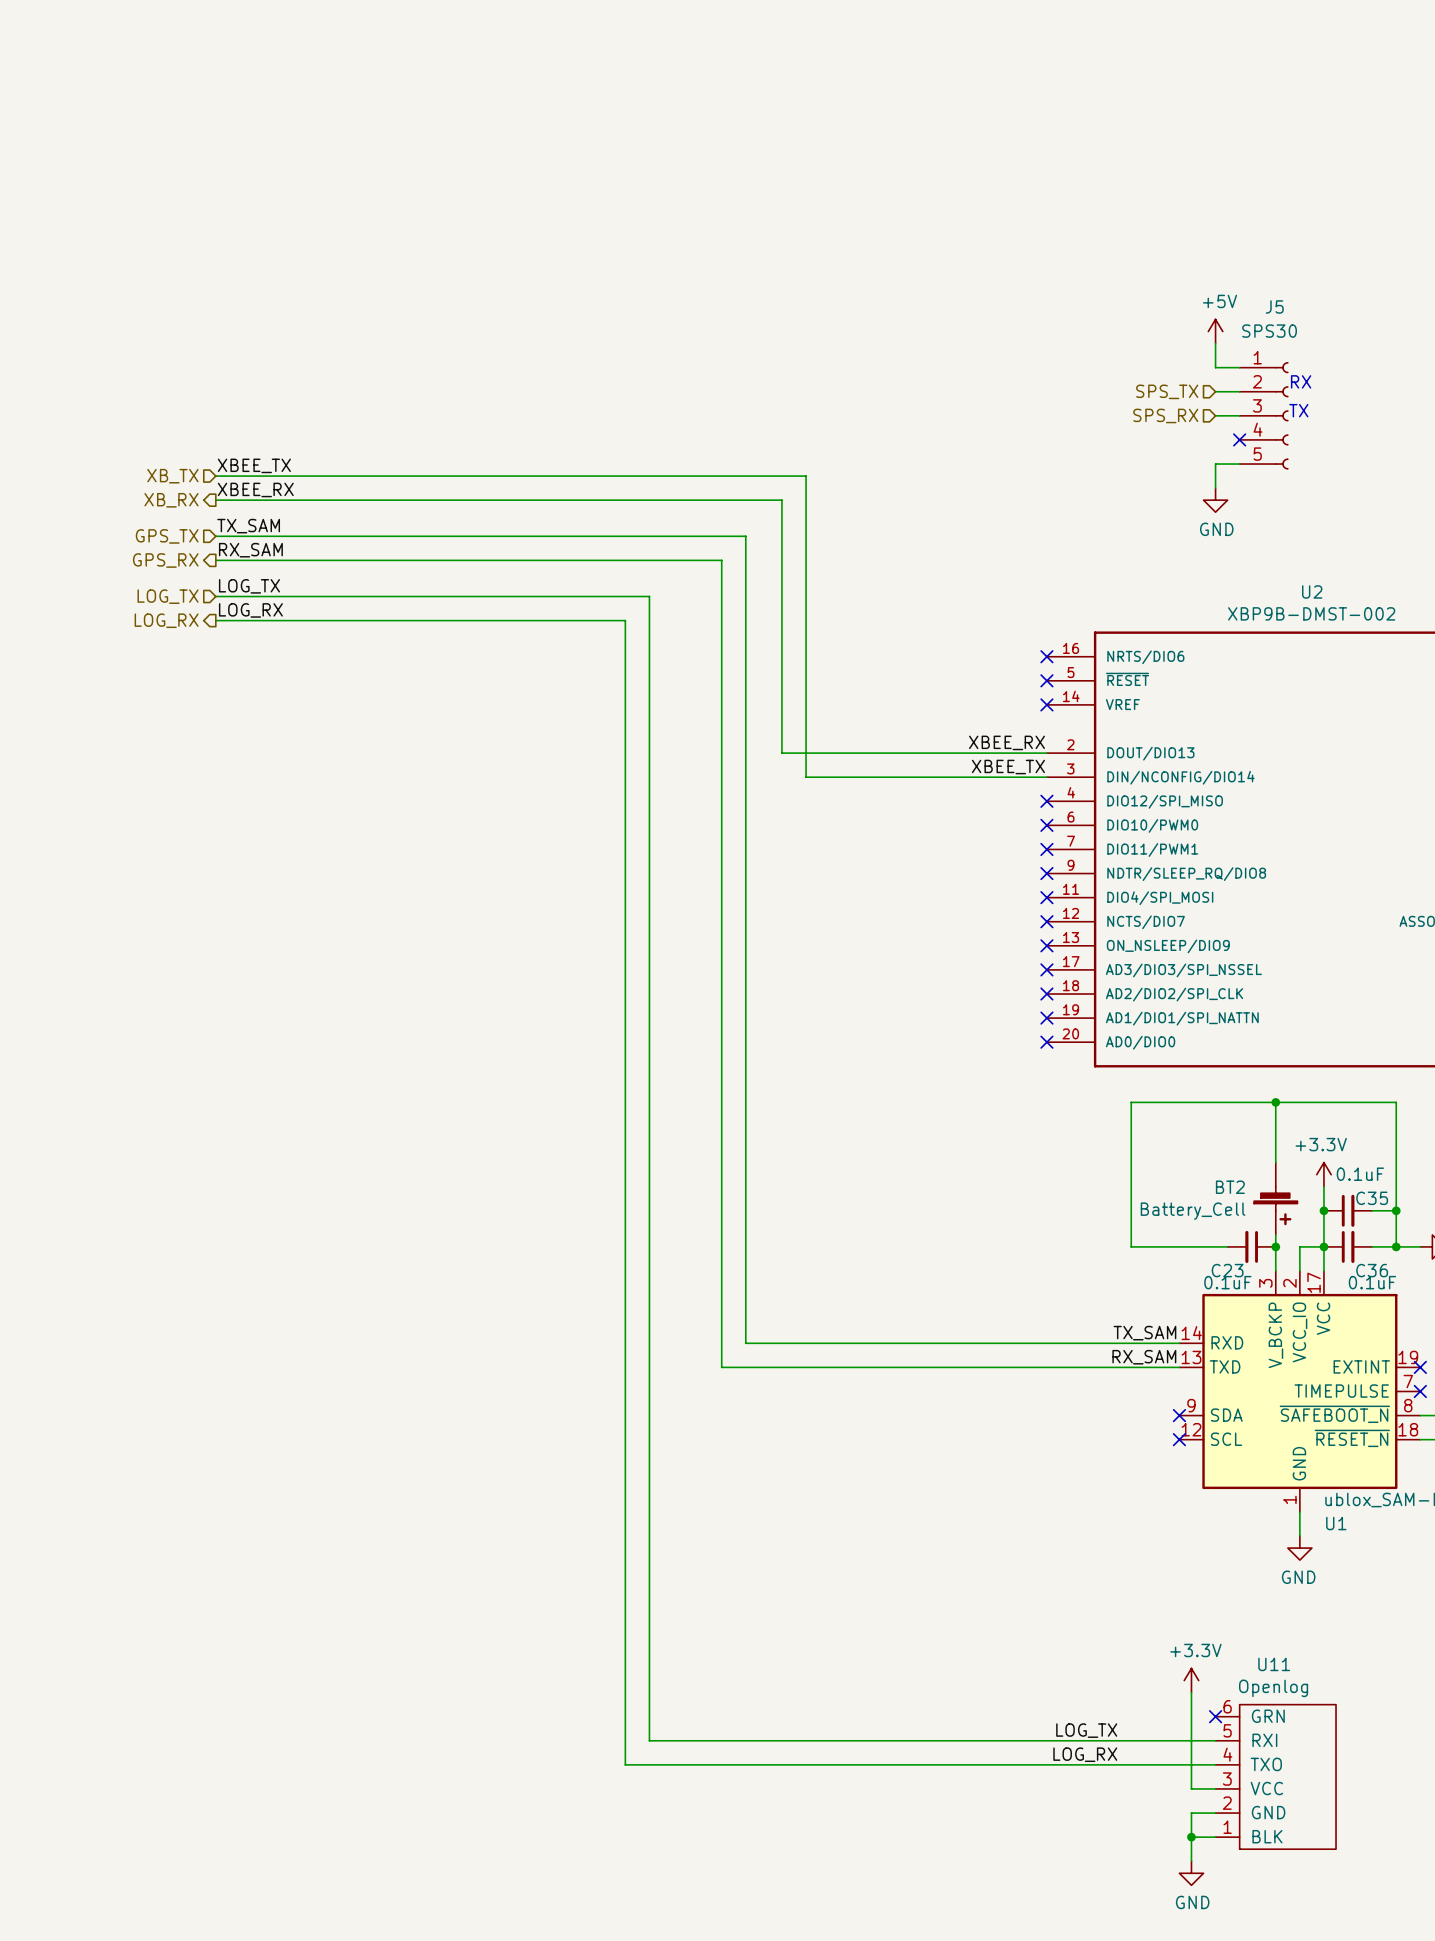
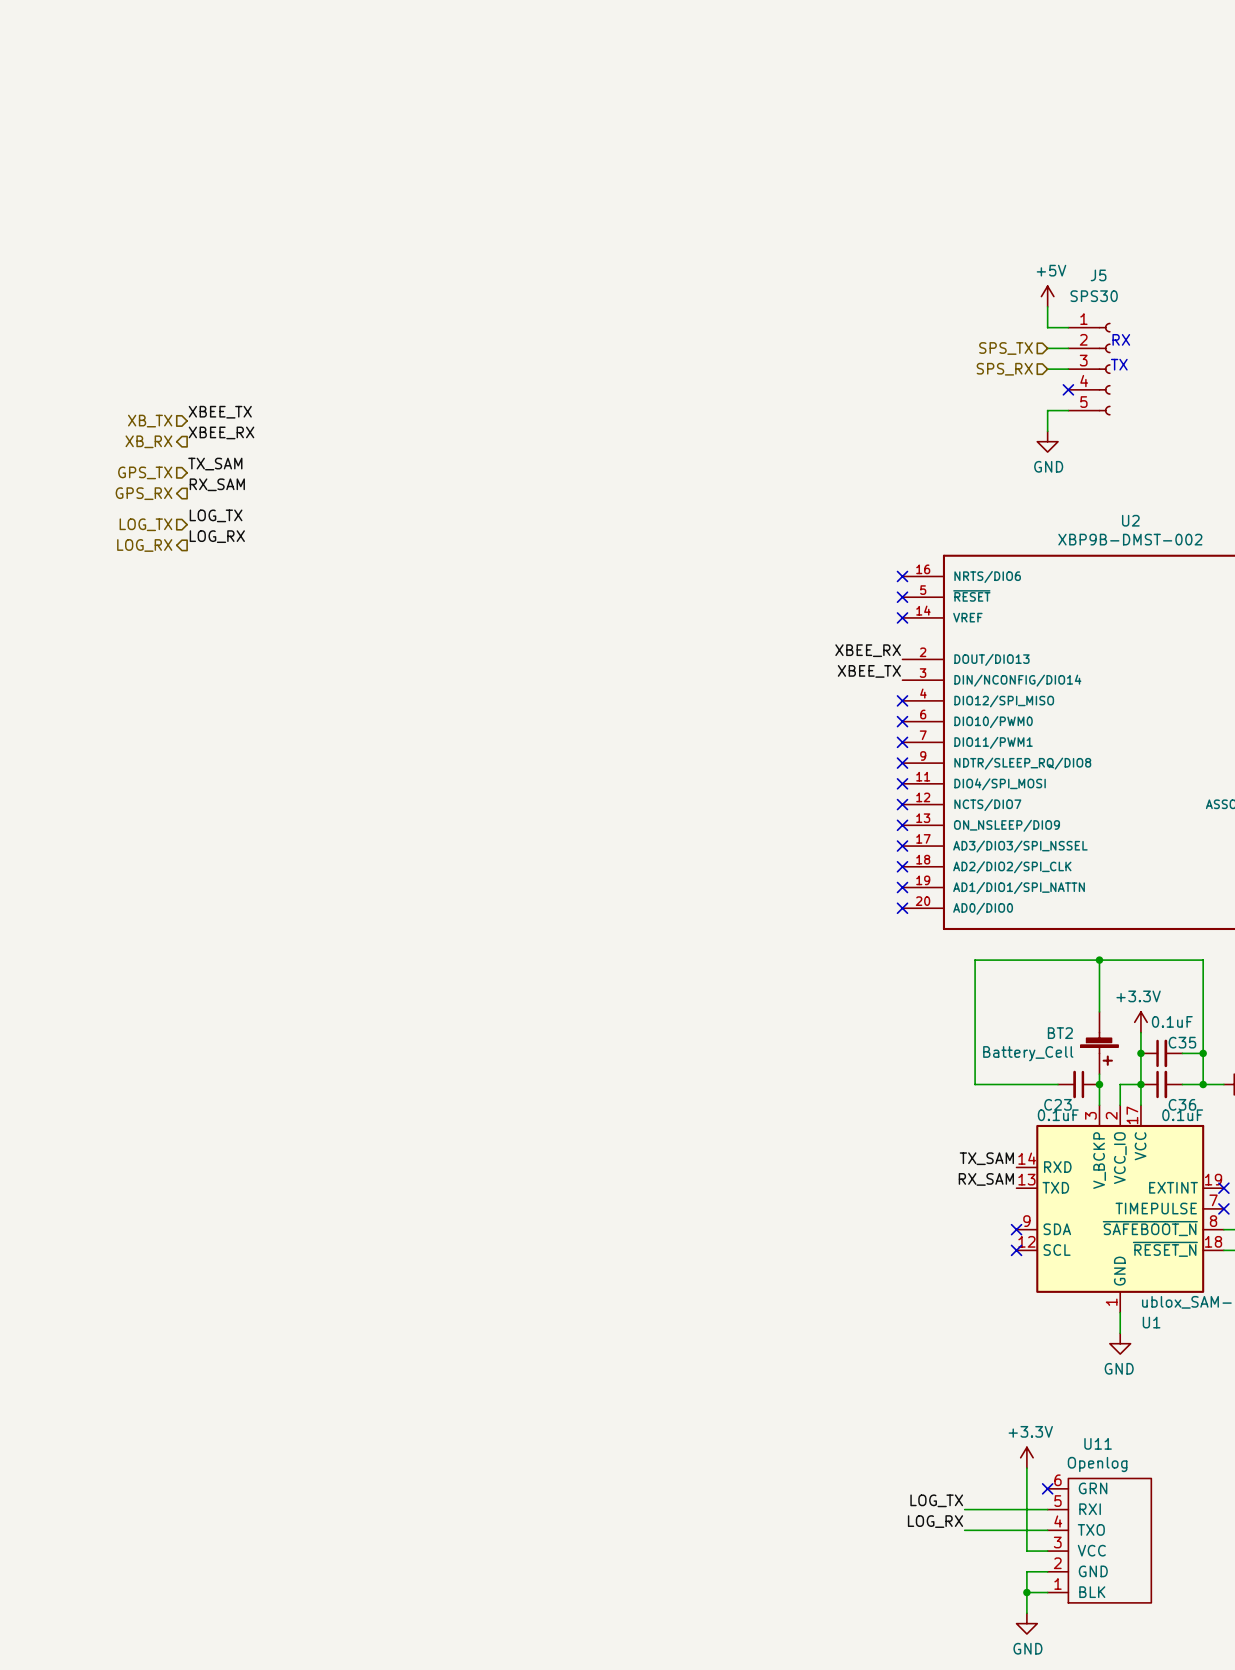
wire: (215, 476) (806, 476) (806, 777) (1046, 777) -> none
wire: (215, 500) (781, 500) (781, 753) (1046, 753) -> none
wire: (215, 536) (745, 536) (745, 1343) (1179, 1343) -> none
wire: (215, 560) (721, 560) (721, 1367) (1179, 1367) -> none
wire: (215, 596) (649, 596) (649, 1740) (1119, 1740) -> none
wire: (215, 620) (625, 620) (625, 1764) (1119, 1764) -> none

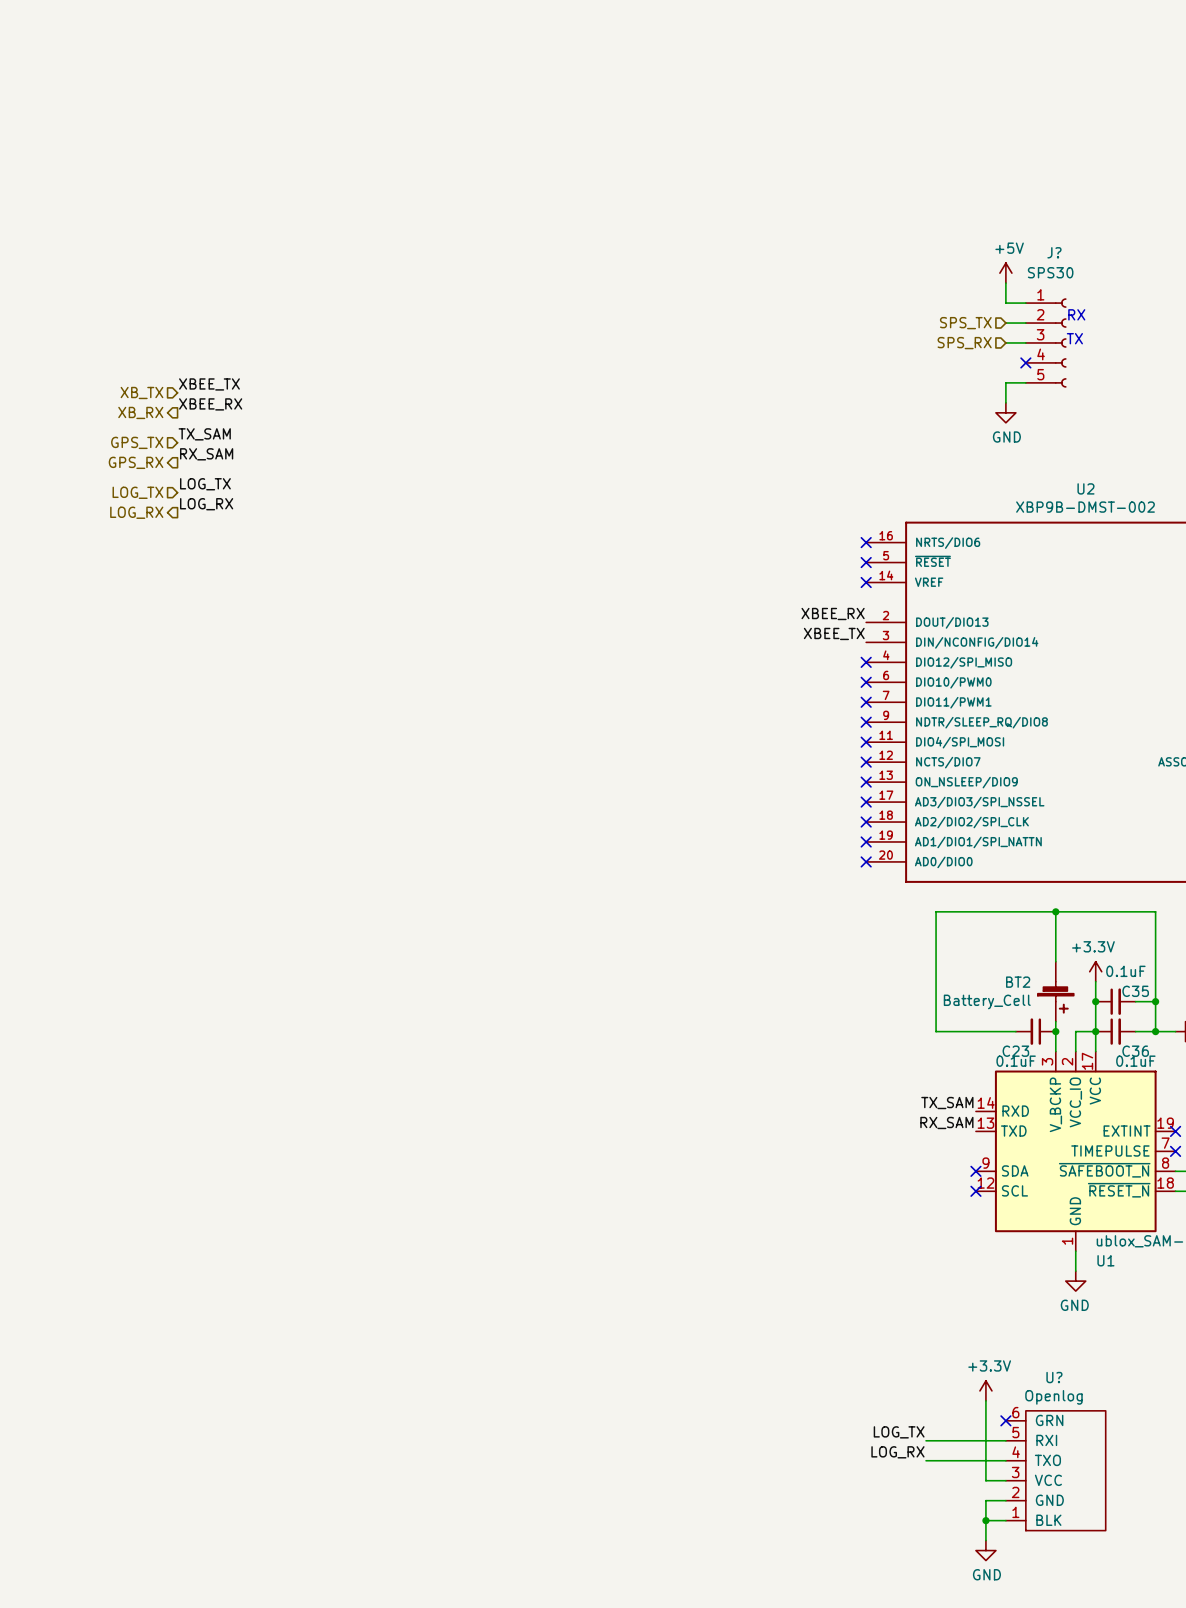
J5 name: J5 (1098, 275) -> J? (1054, 252)
U11 name: U11 (1098, 1443) -> U? (1054, 1377)

